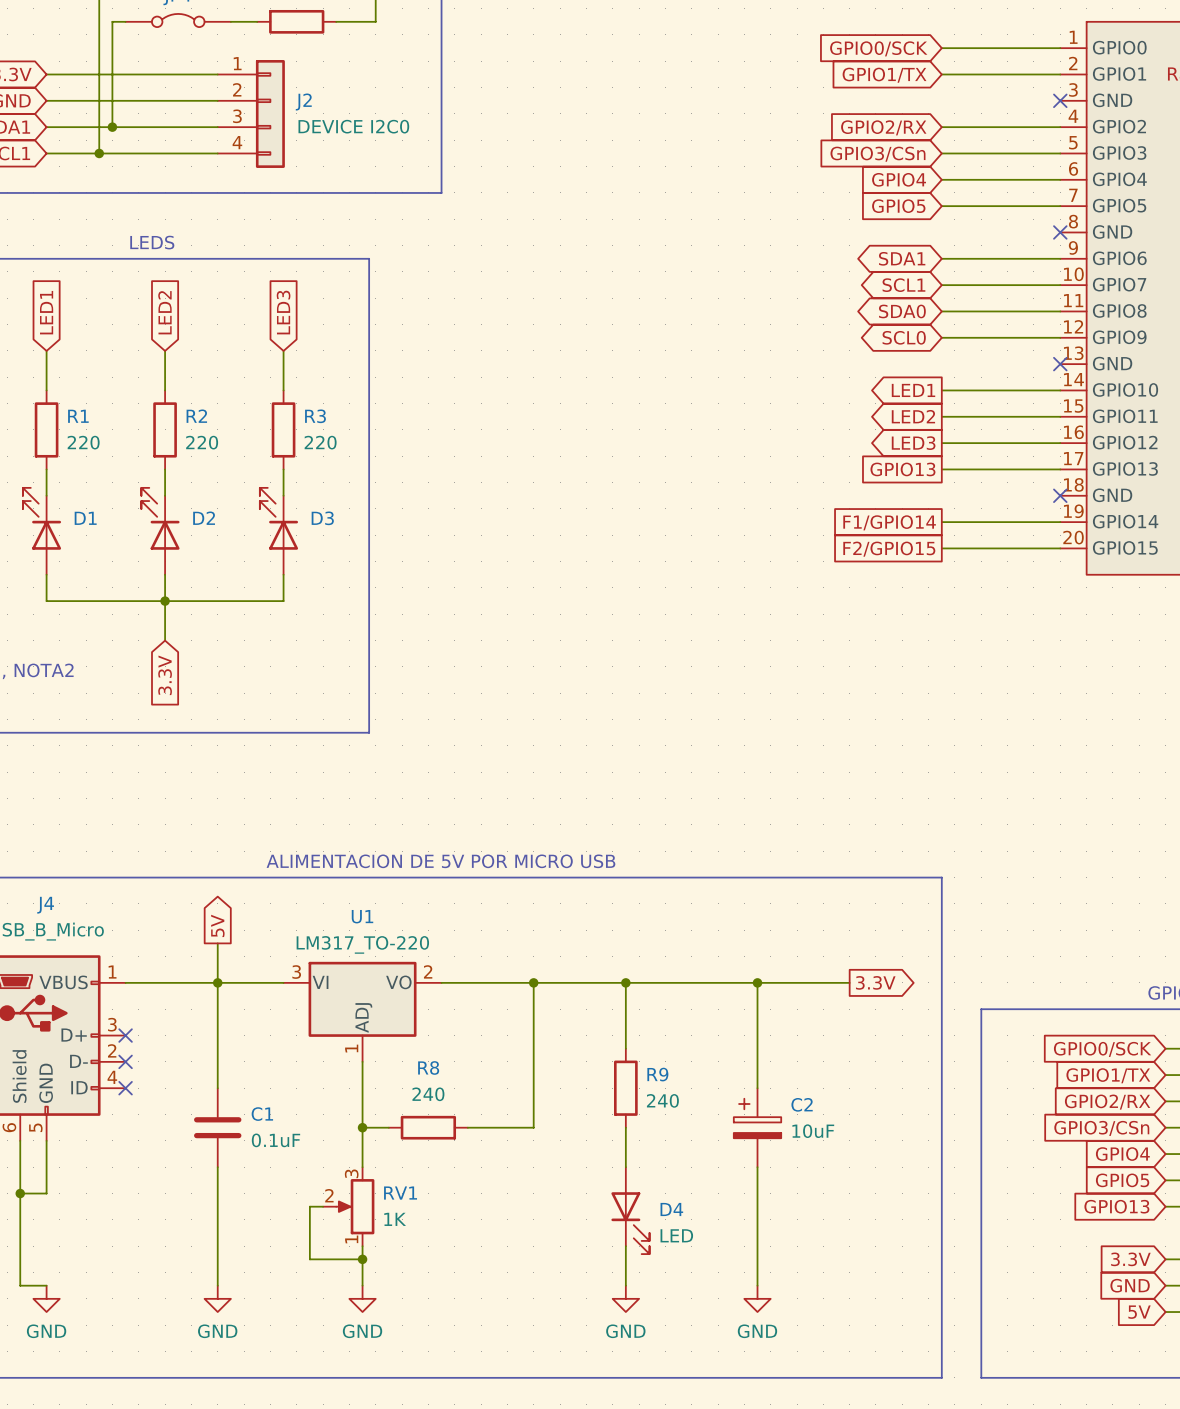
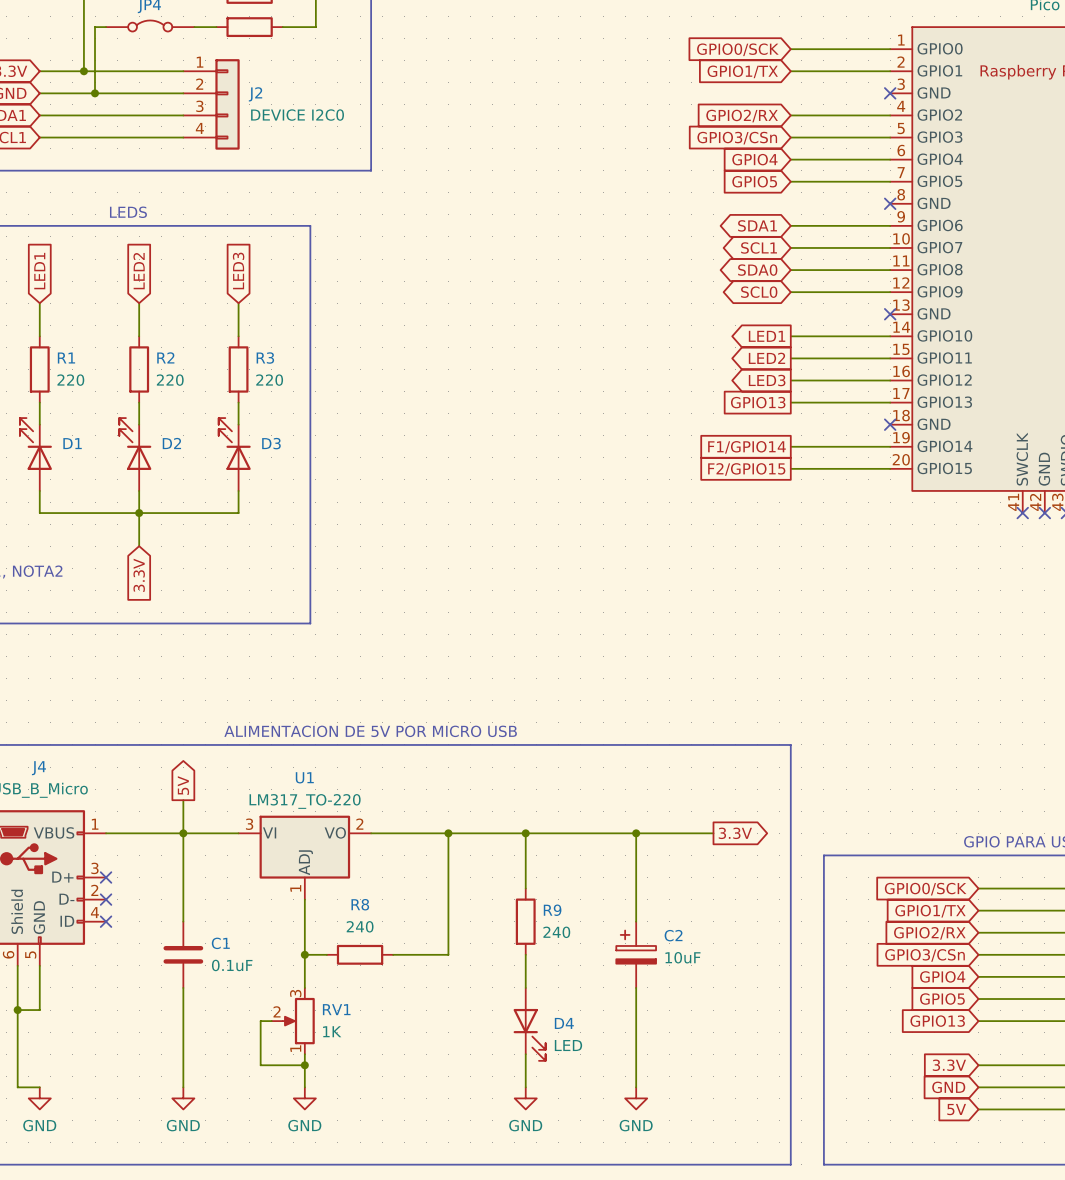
wire: (99, 74) (99, 153) -> none
junction: none -> (83, 71)
wire: (112, 100) (112, 127) -> none
junction position: (112, 127) -> (95, 93)
junction: (99, 153) -> none

